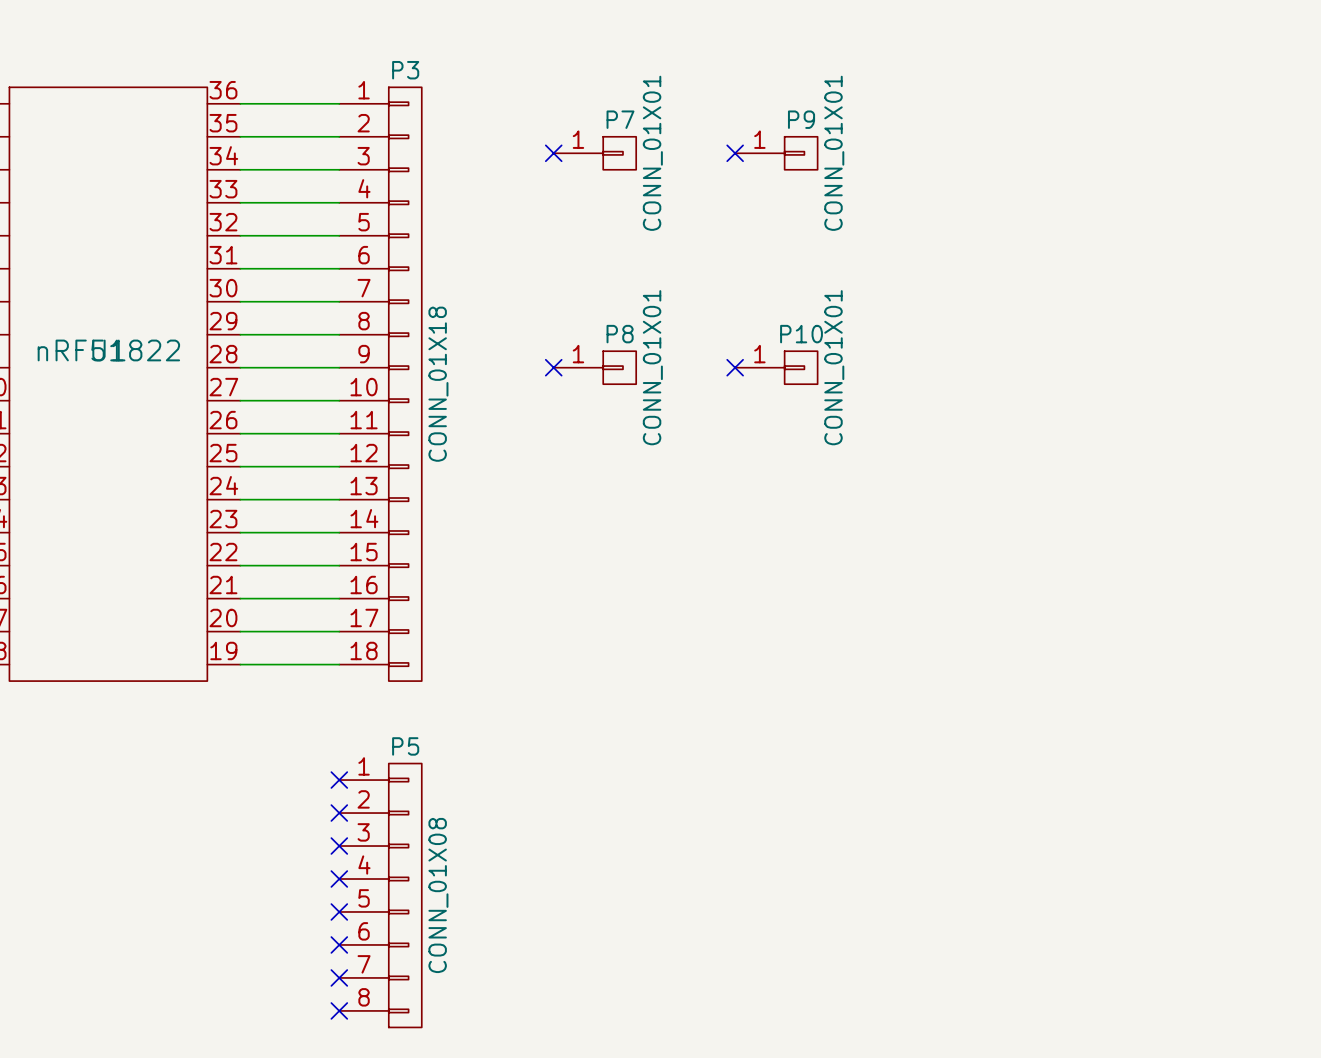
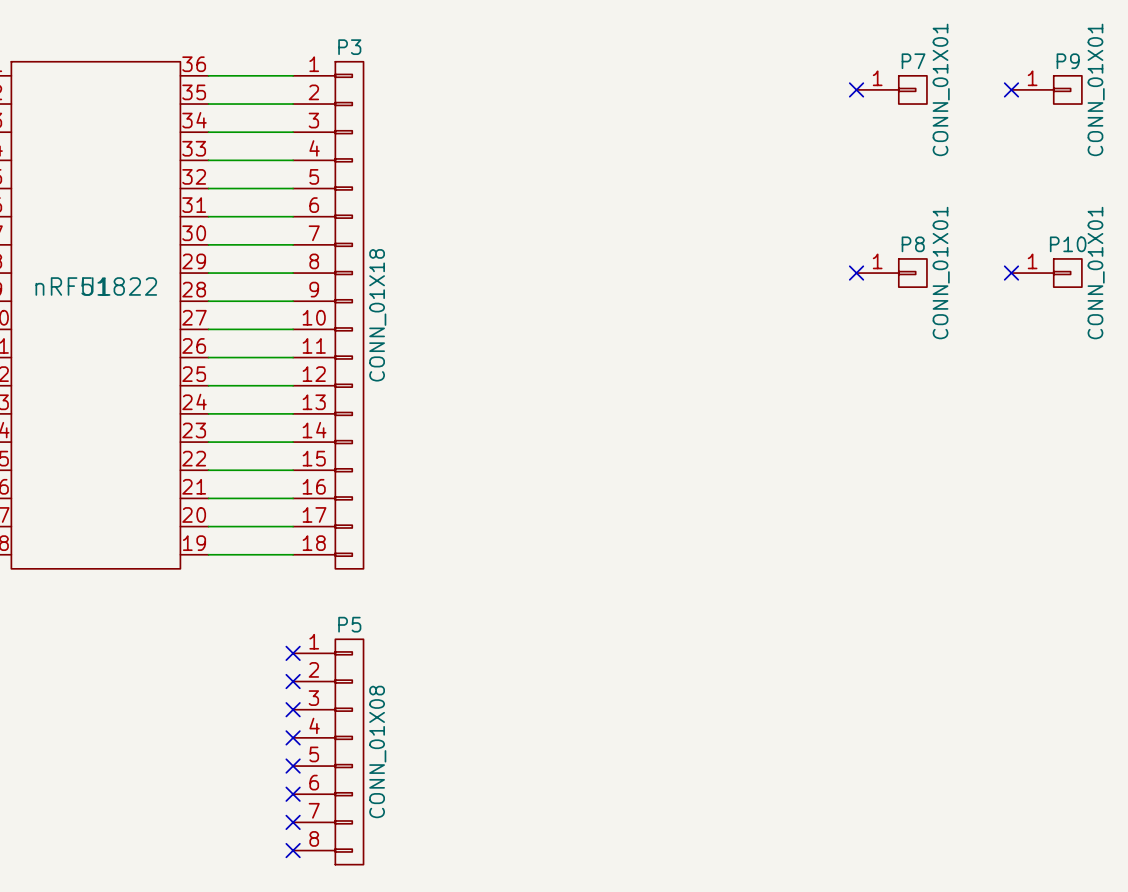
no-connect mark: none -> (856, 89)
no-connect mark: none -> (1011, 89)
no-connect mark: (553, 153) -> none
P7 position: (594, 153) -> (891, 89)
no-connect mark: (735, 153) -> none
P9 position: (776, 153) -> (1046, 89)
no-connect mark: none -> (856, 273)
no-connect mark: none -> (1011, 273)
no-connect mark: (553, 367) -> none
P8 position: (594, 367) -> (891, 273)
no-connect mark: (735, 367) -> none
P10 position: (776, 367) -> (1046, 273)

